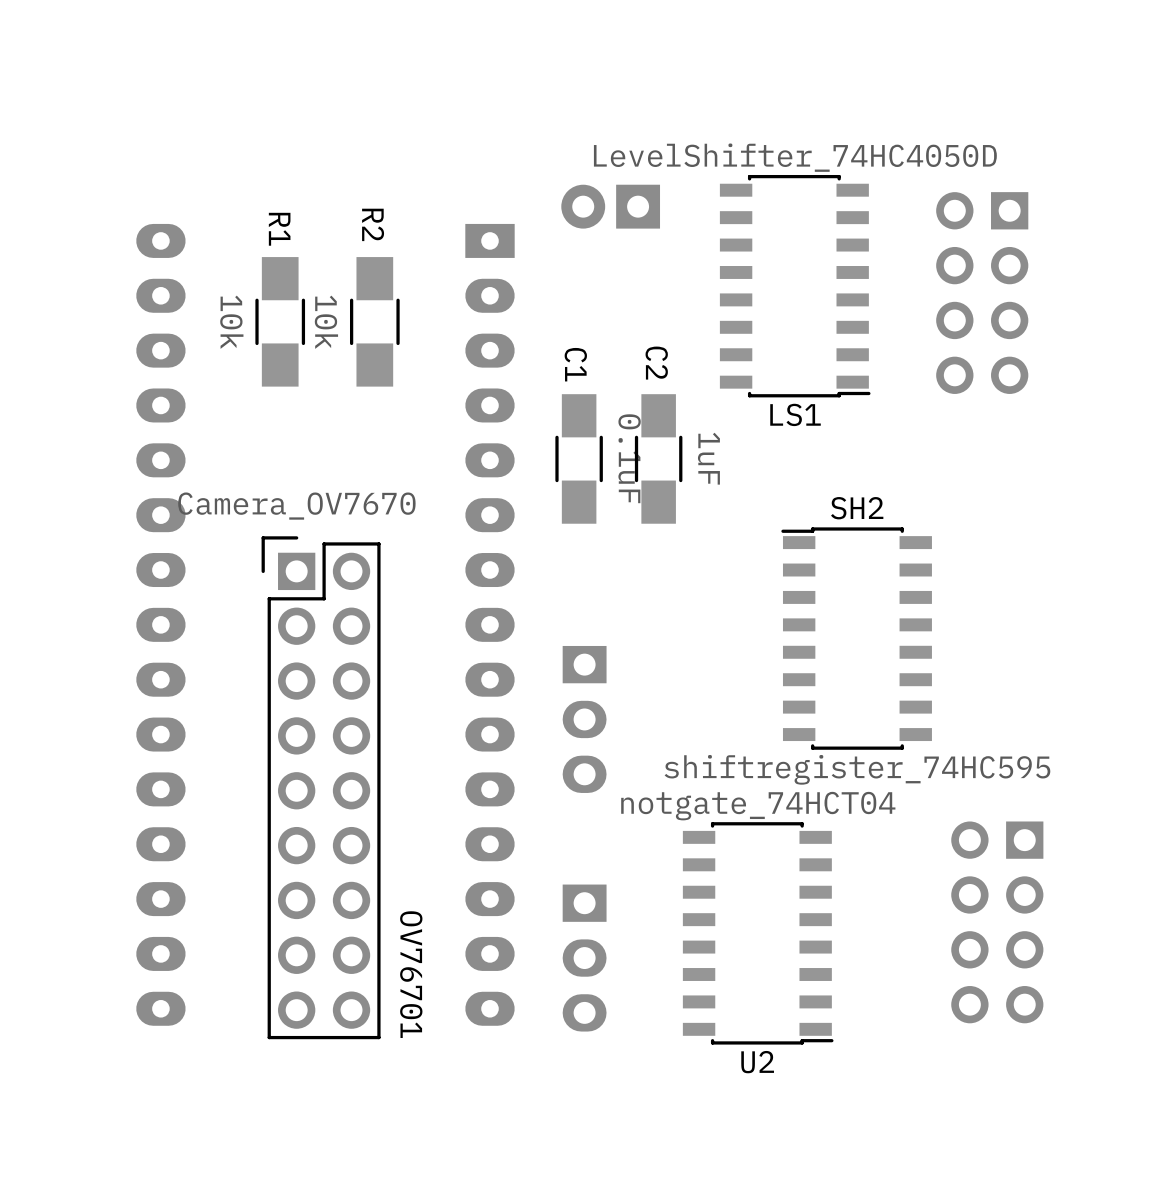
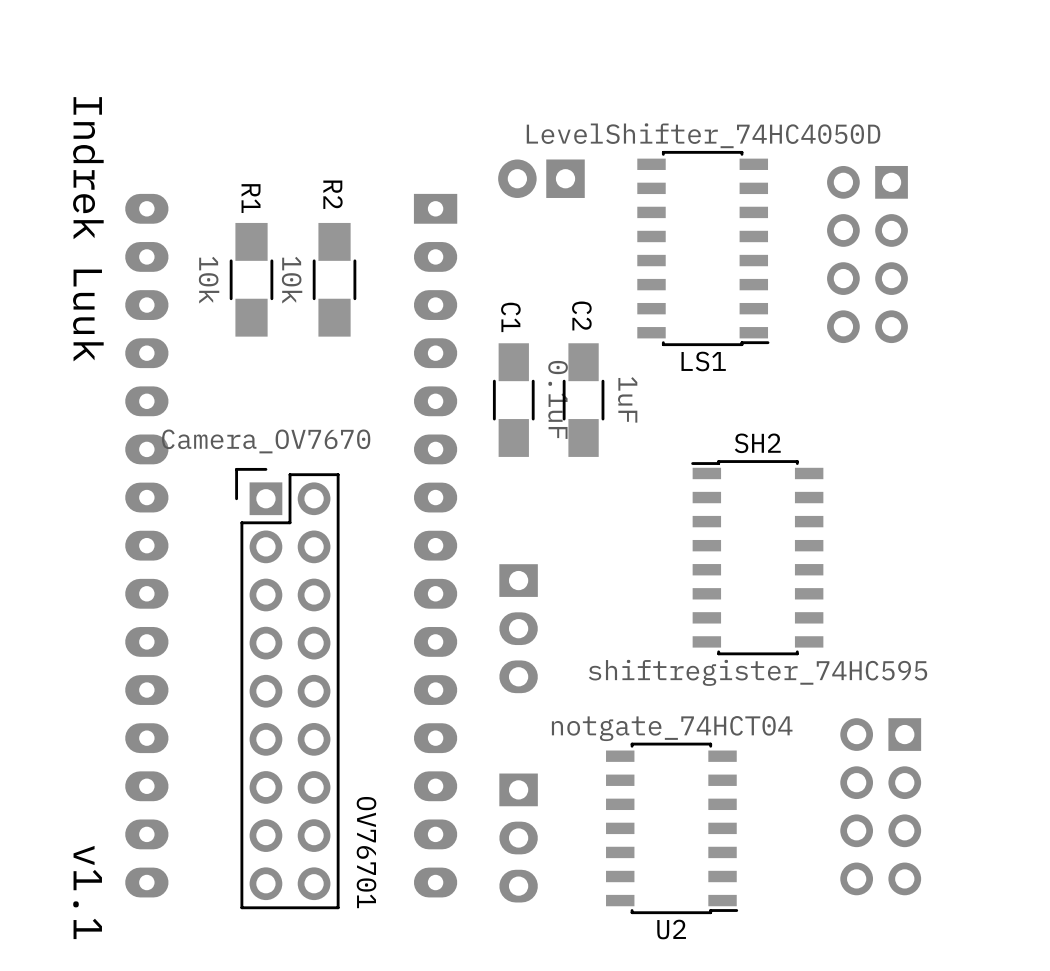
text: none -> Indrek Luuk (88, 229)
U2 footprint: [682, 822, 834, 1045] -> [606, 742, 739, 915]
text: none -> v1.1 (87, 892)

